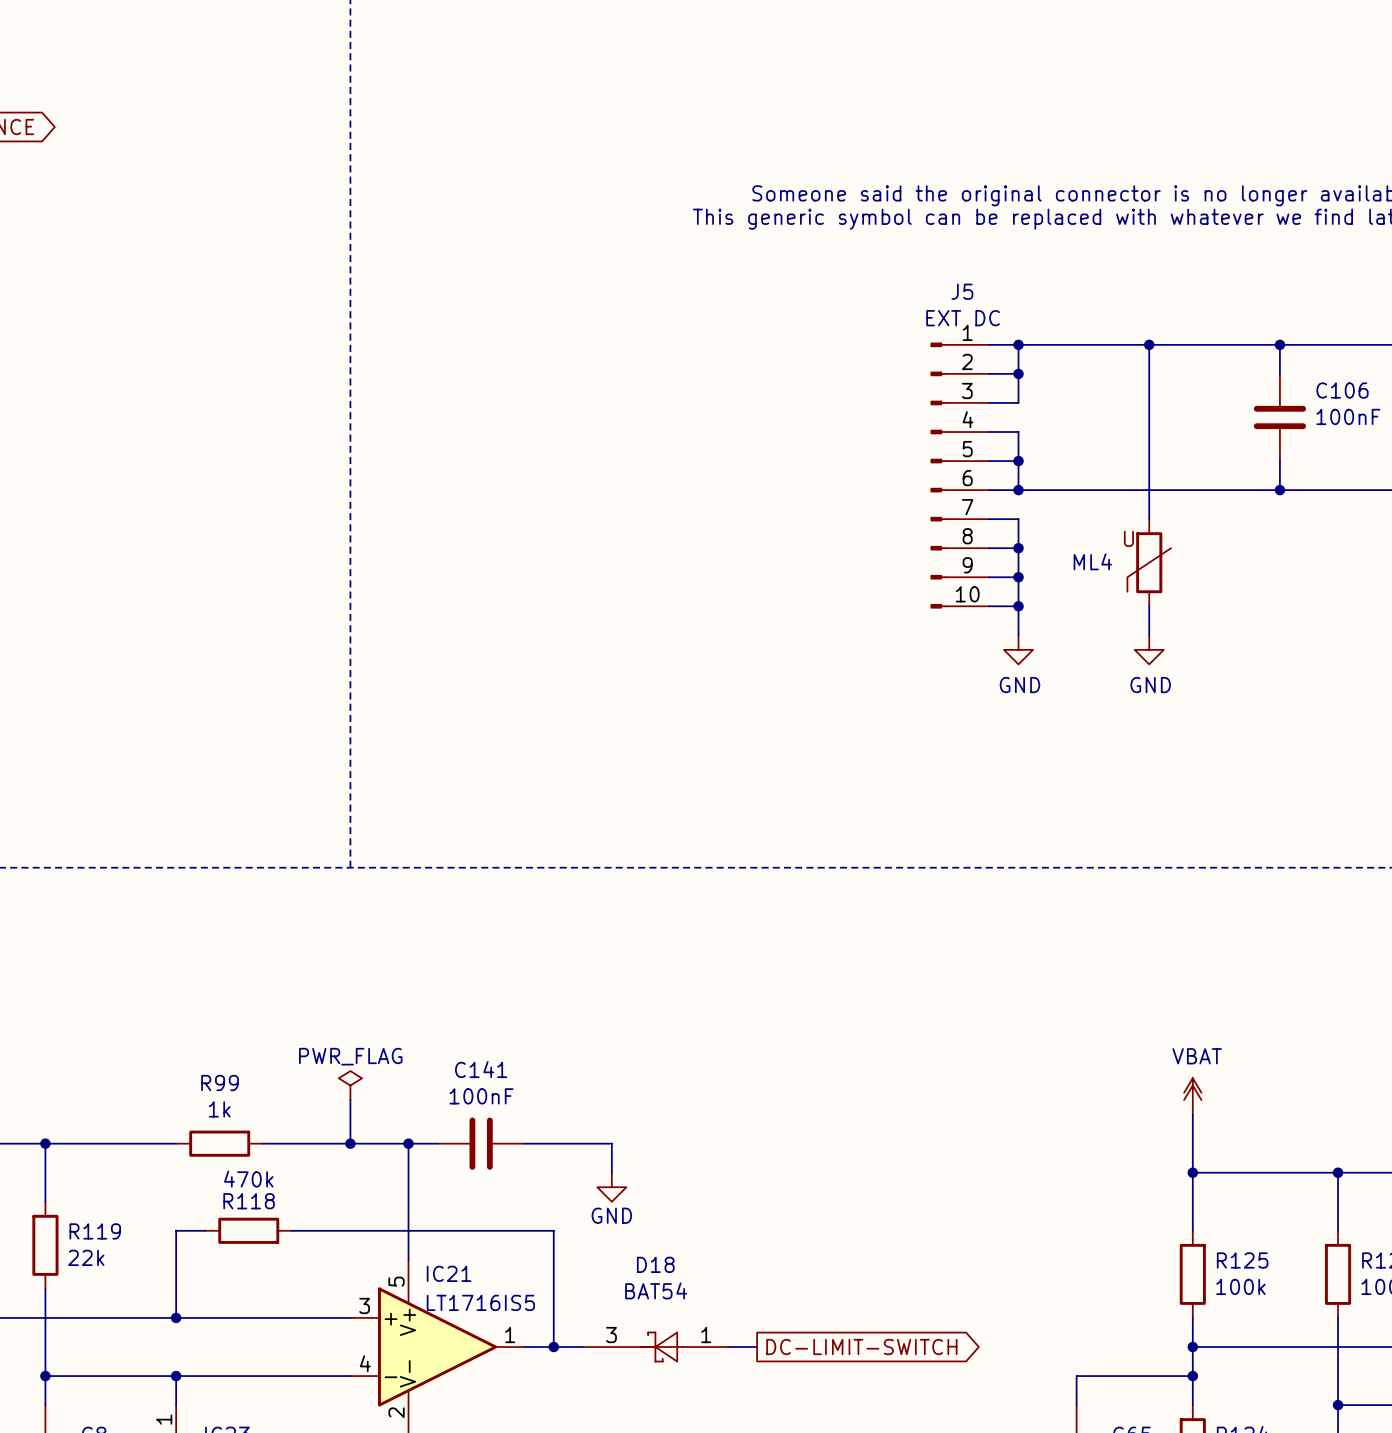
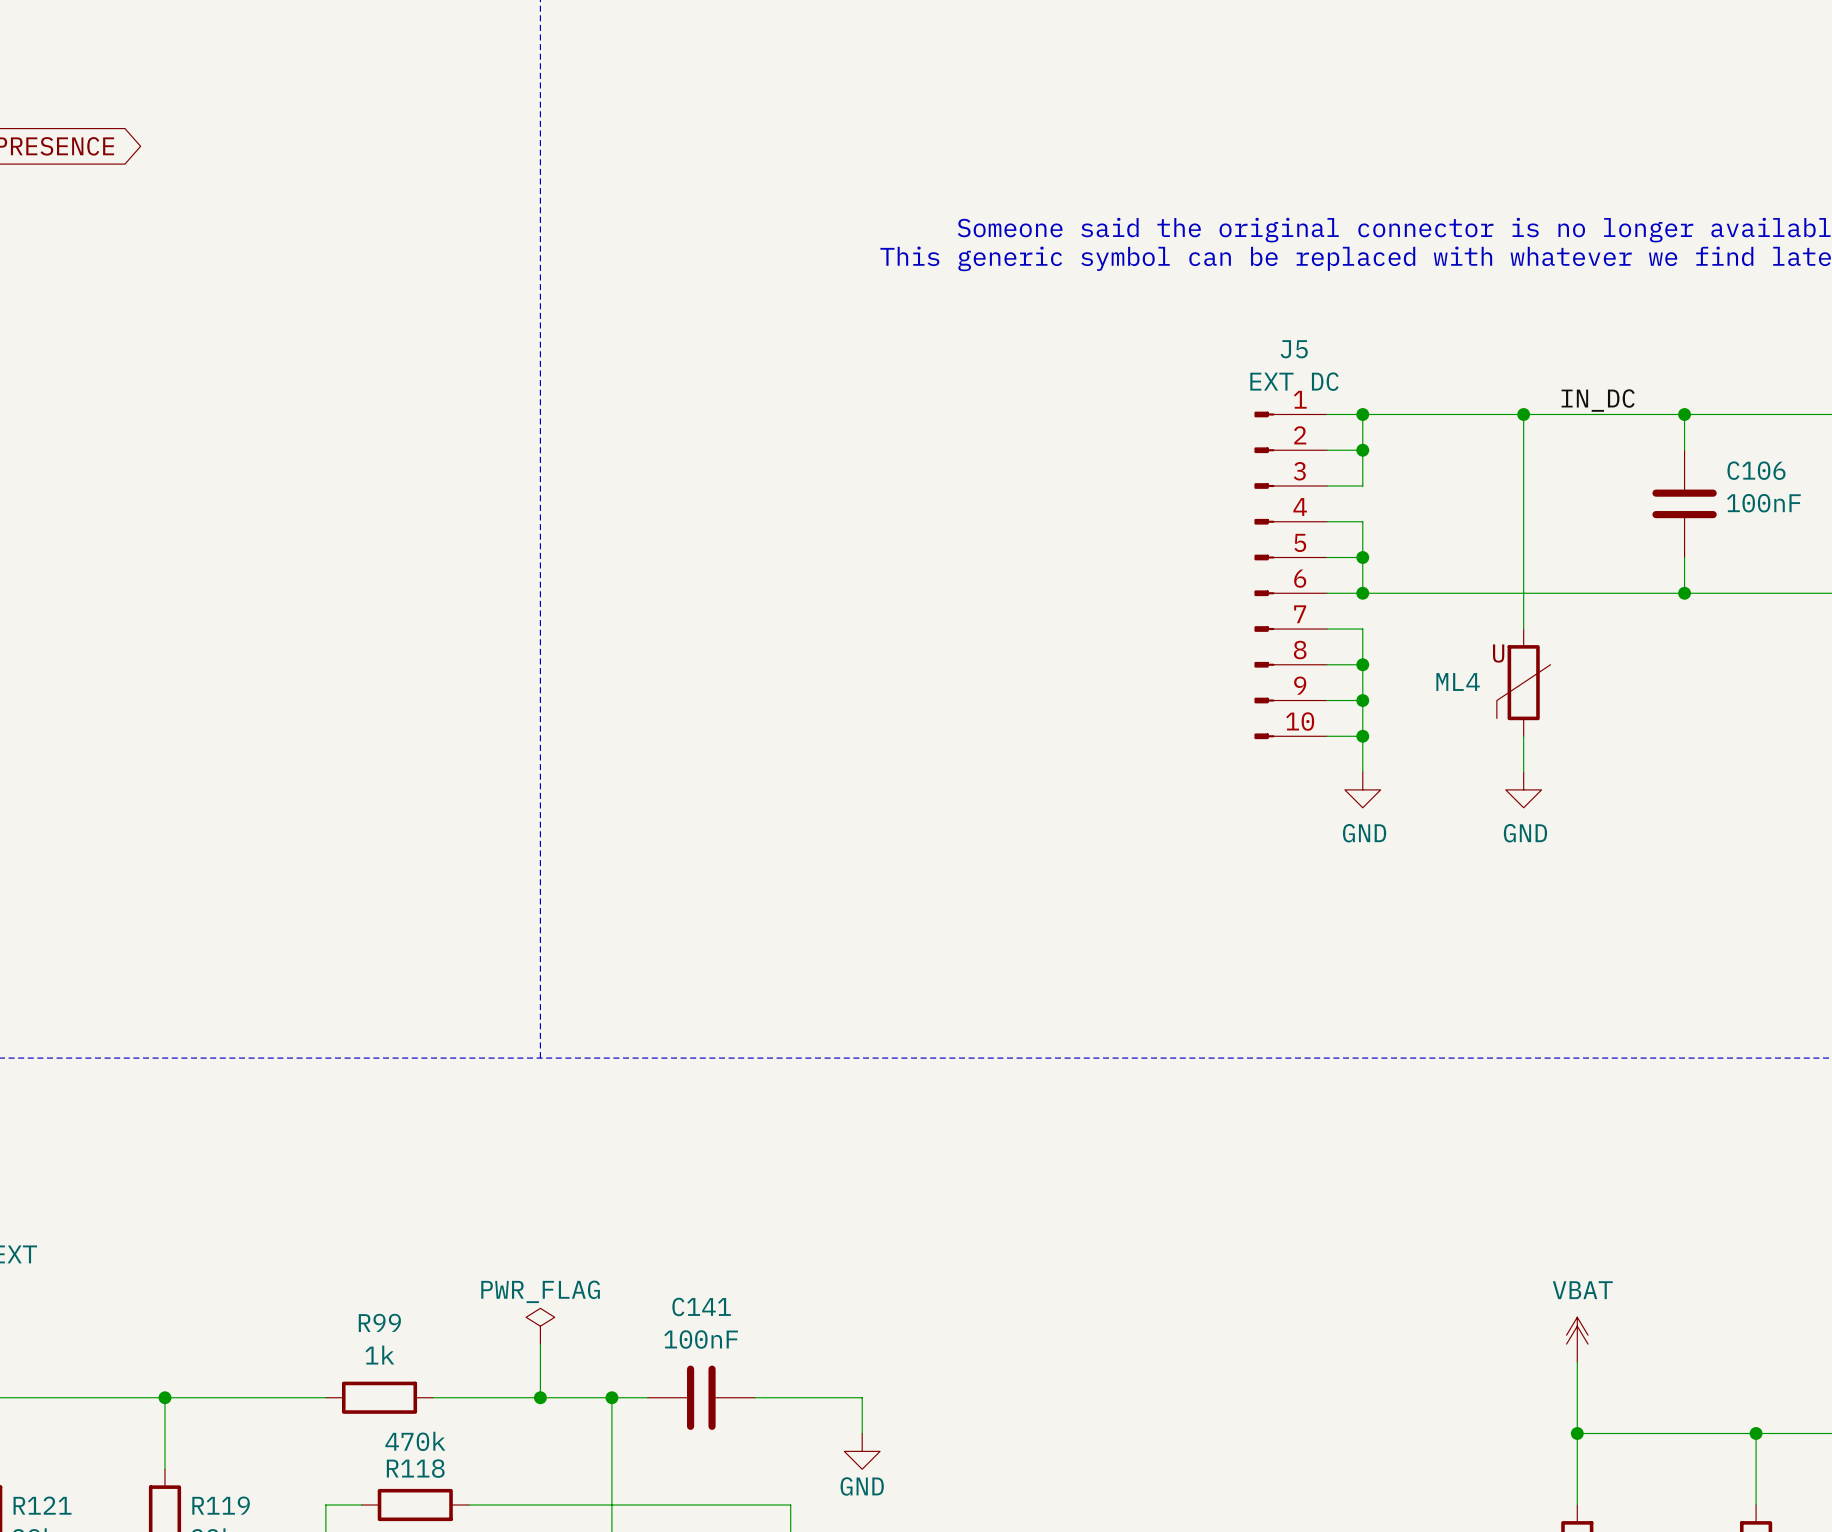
label: none -> IN_DC (1598, 400)

